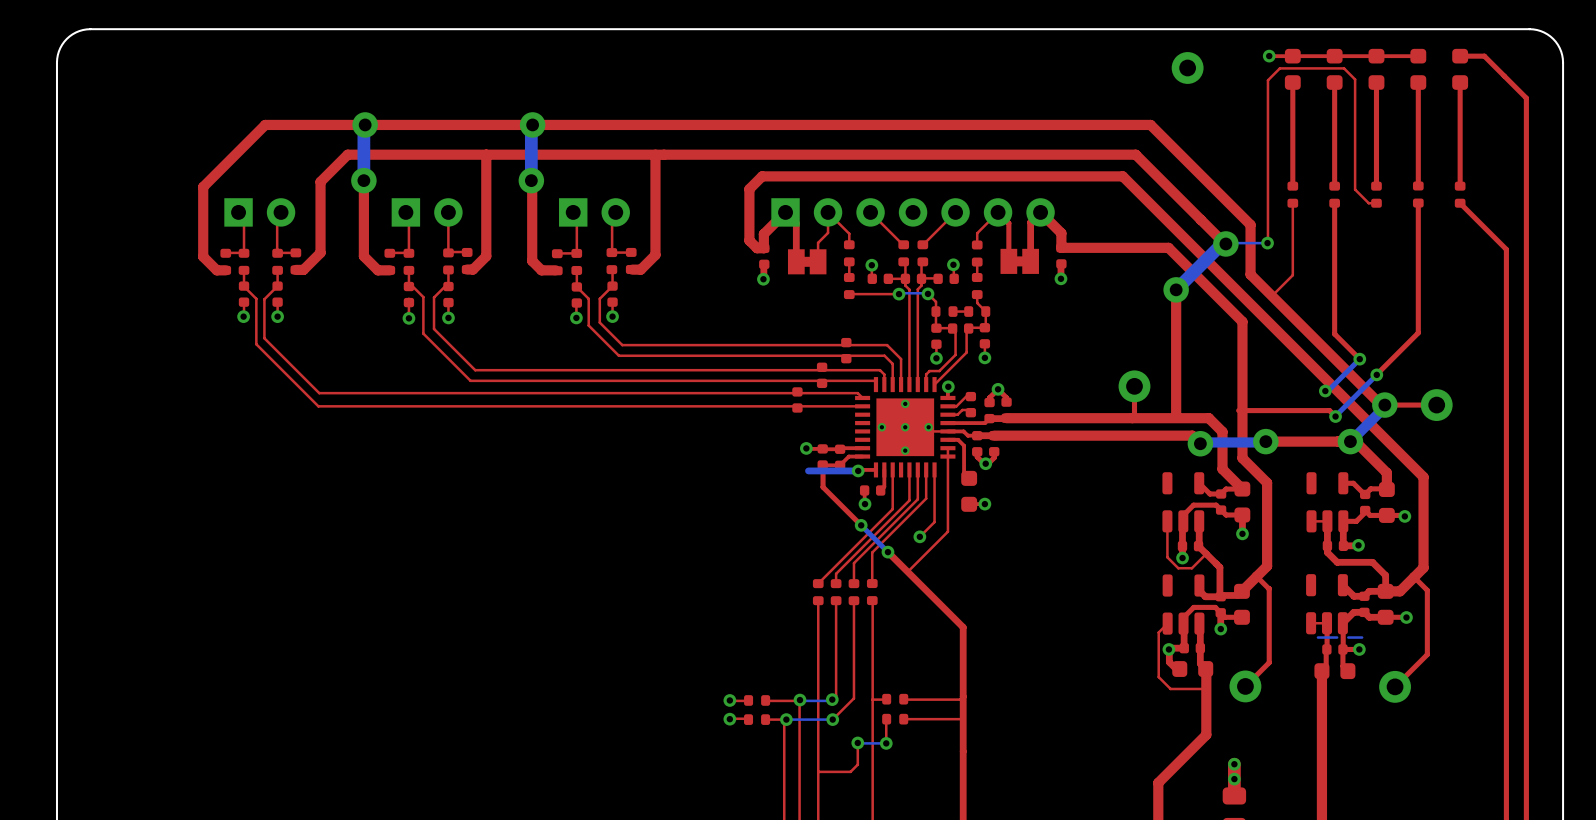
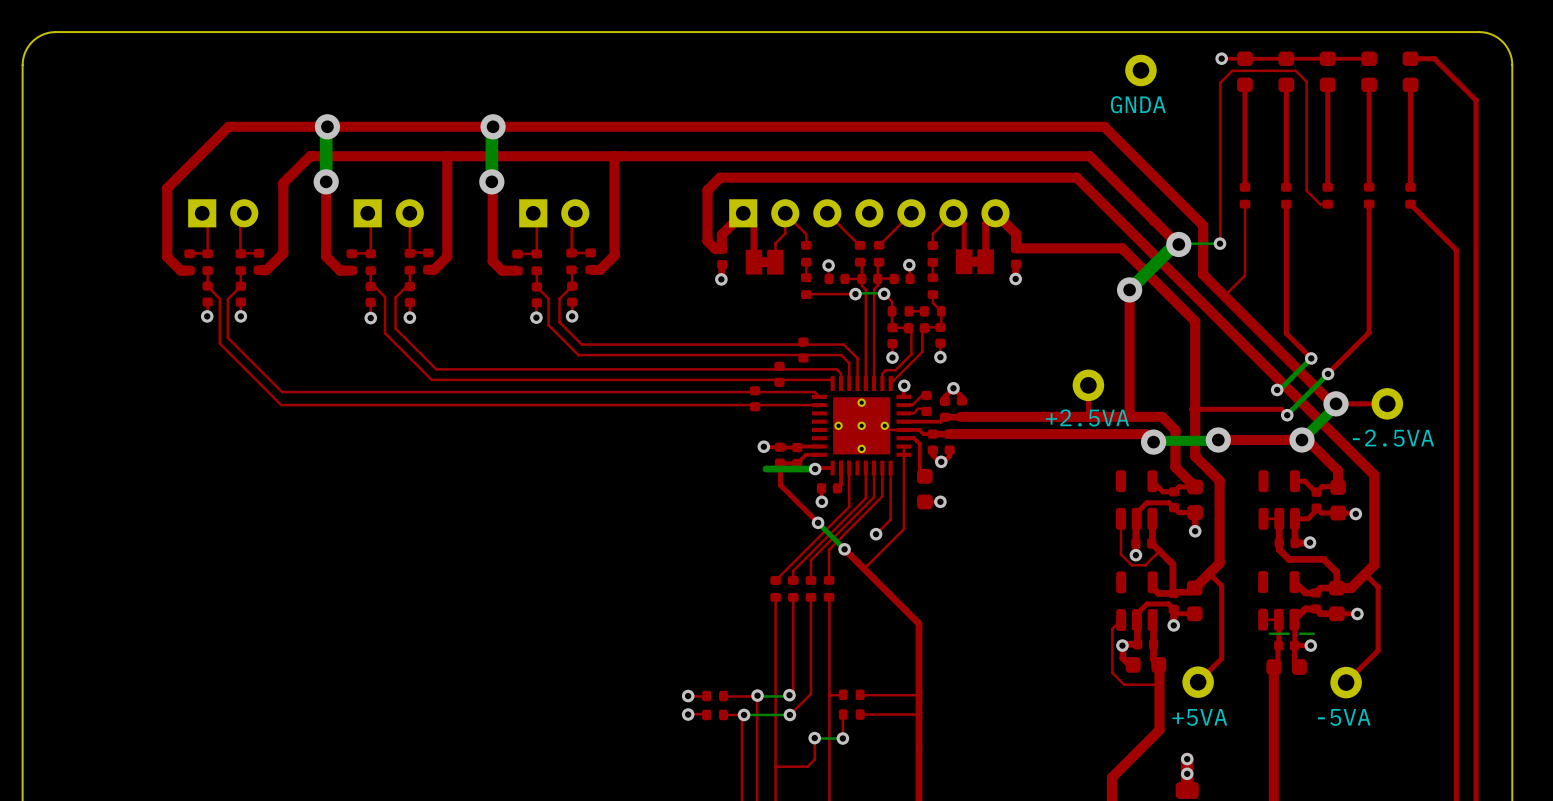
text: none -> GNDA (1138, 104)
text: none -> +2.5VA (1087, 417)
text: none -> -2.5VA (1393, 438)
text: none -> +5VA (1199, 717)
text: none -> -5VA (1344, 717)

